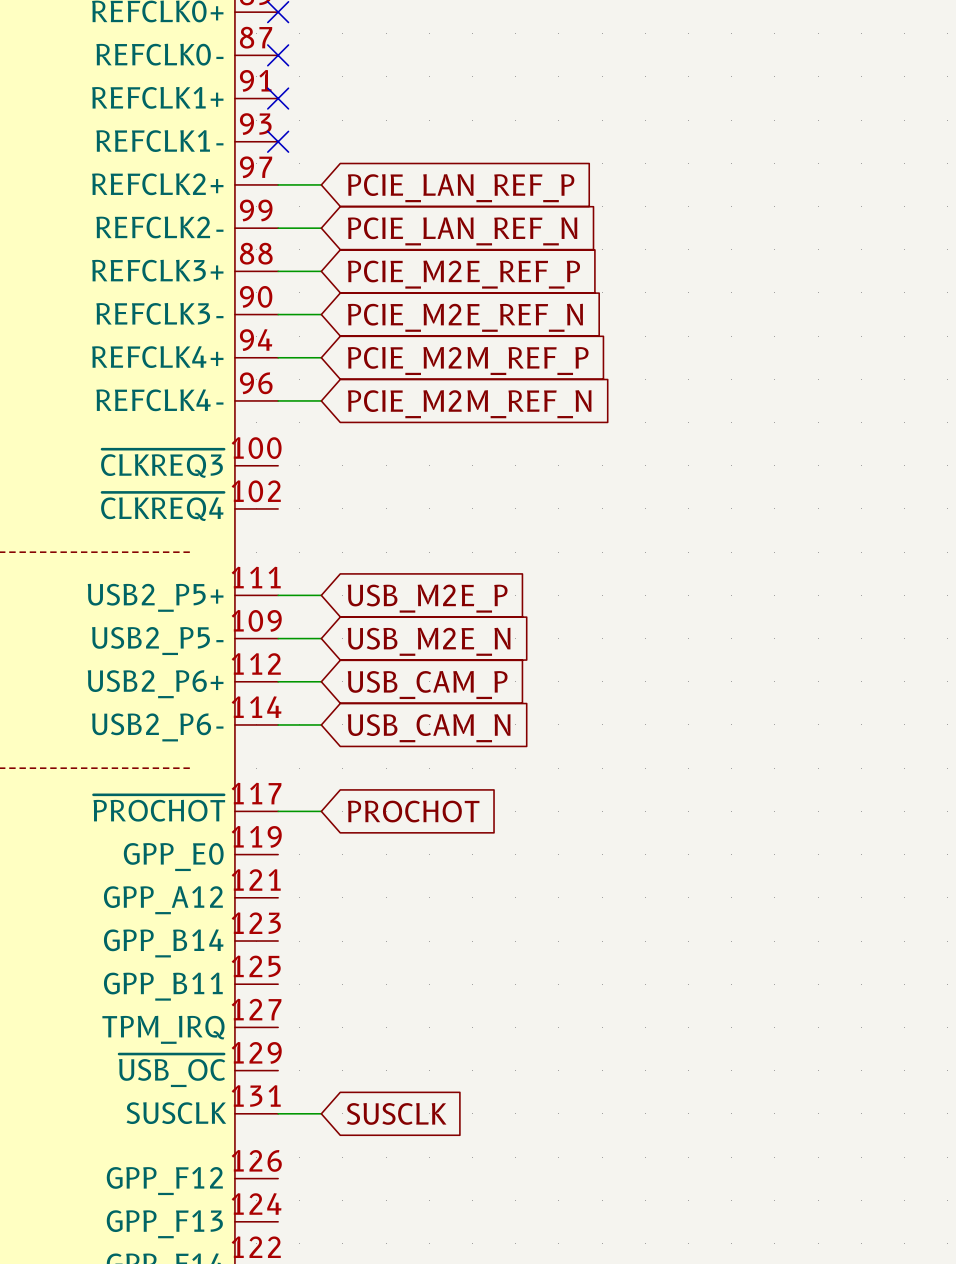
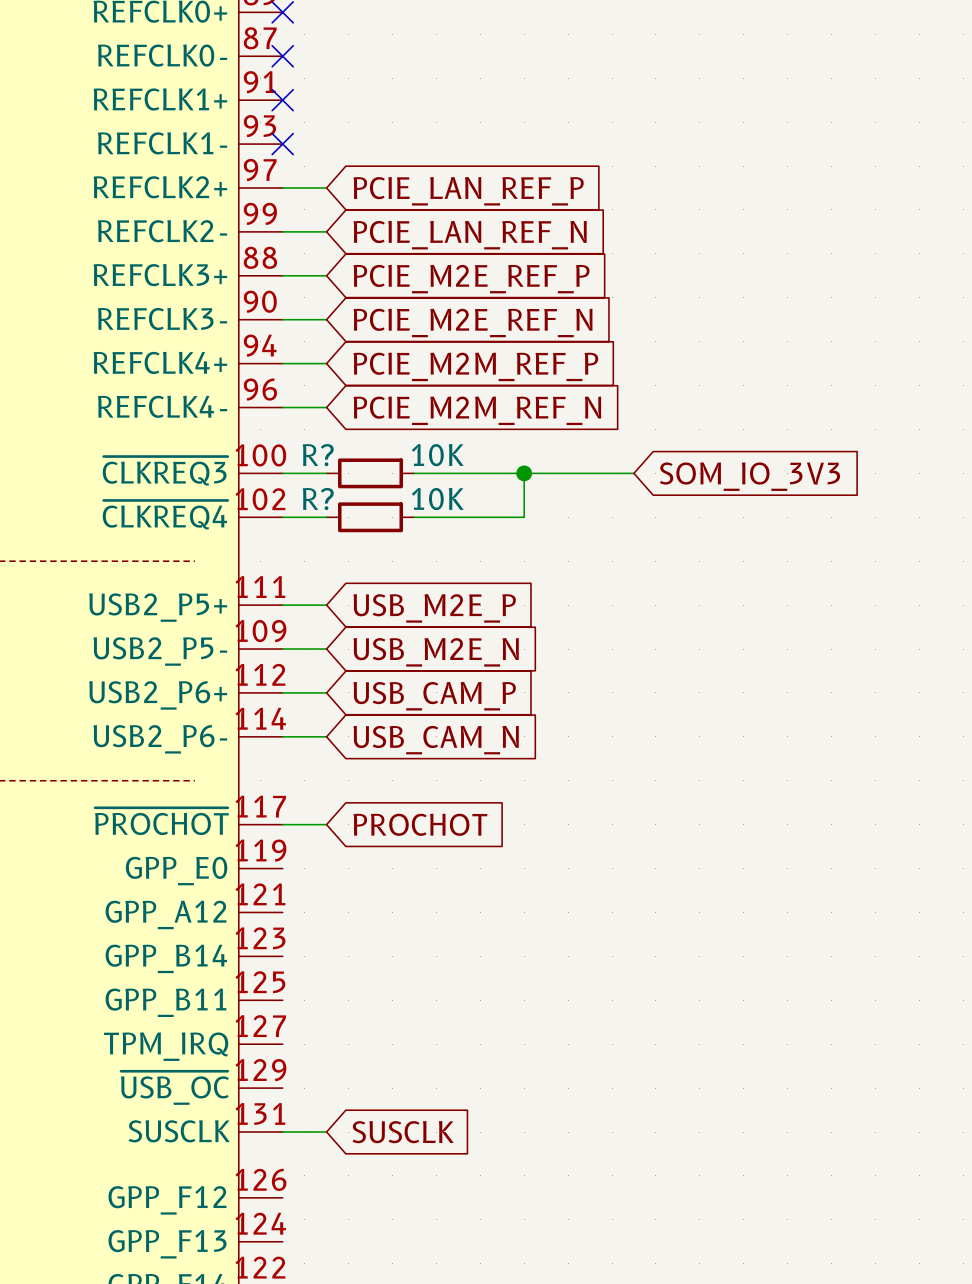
wire: none -> (282, 473) (326, 473)
R?: none -> 10K (370, 473)
wire: none -> (414, 473) (633, 473)
wire: none -> (524, 473) (524, 517) (414, 517)
junction: none -> (524, 473)
global label: none -> SOM_IO_3V3 (749, 476)
wire: none -> (282, 517) (326, 517)
R?: none -> 10K (370, 517)

